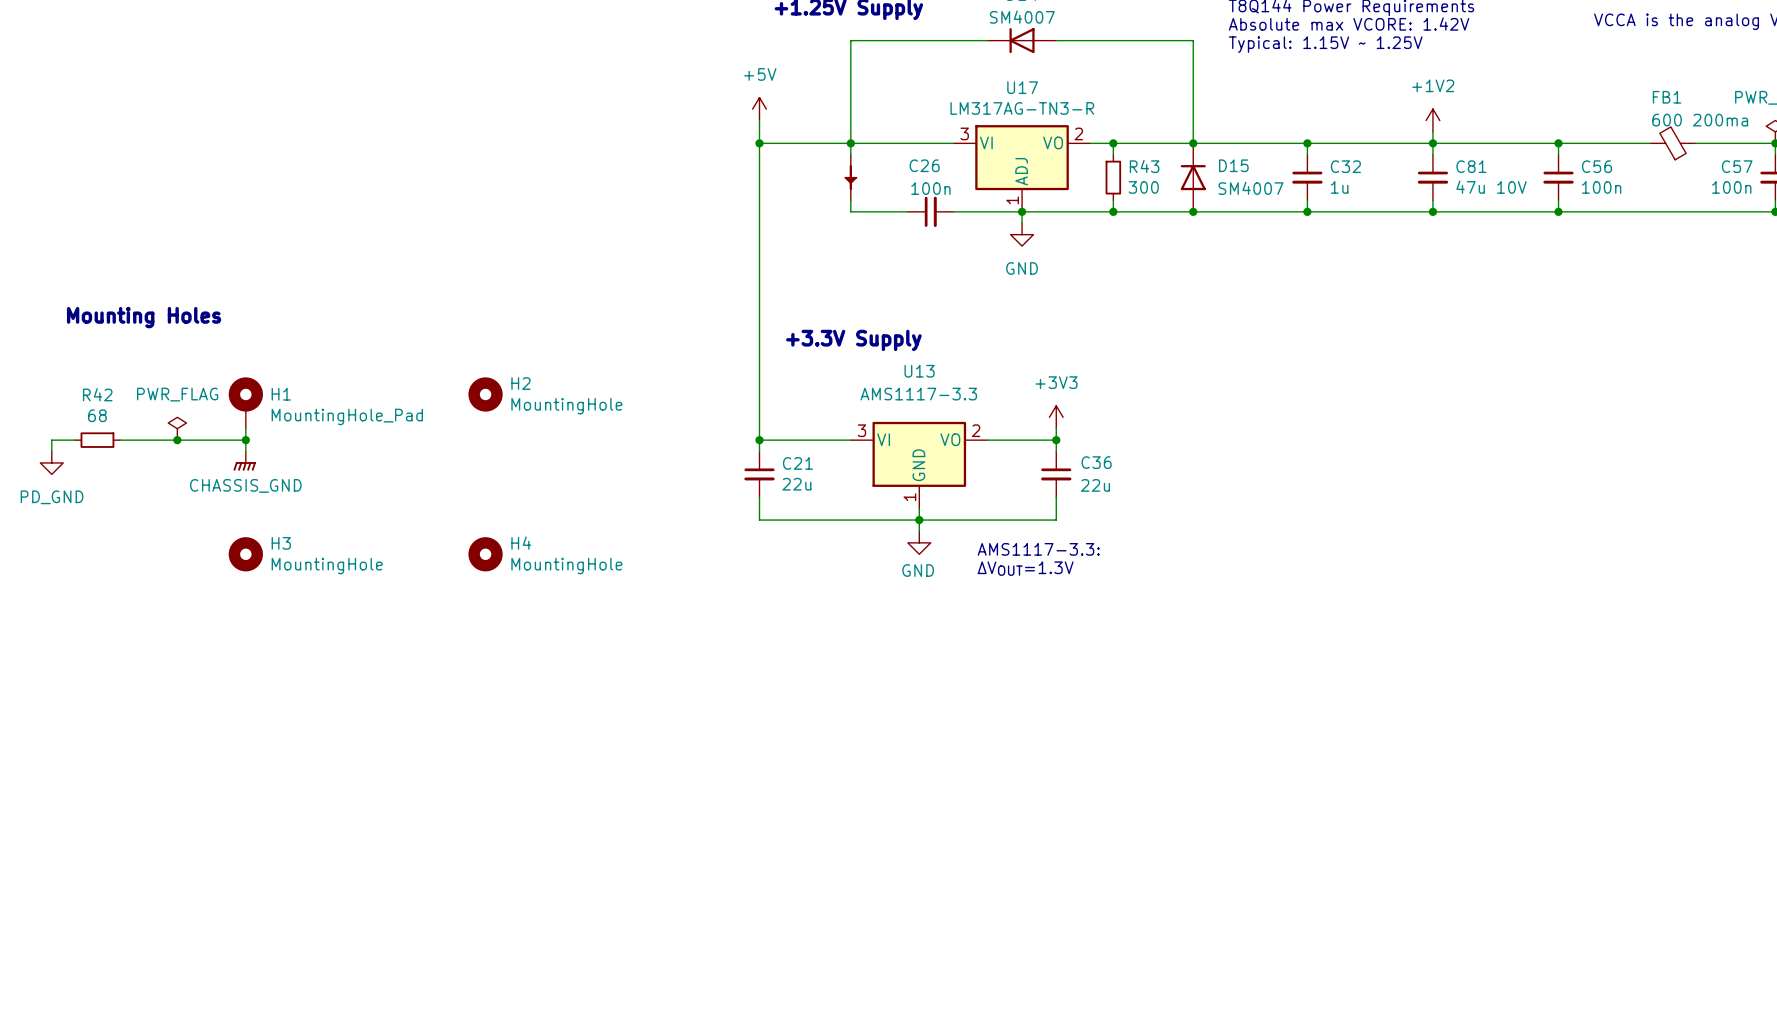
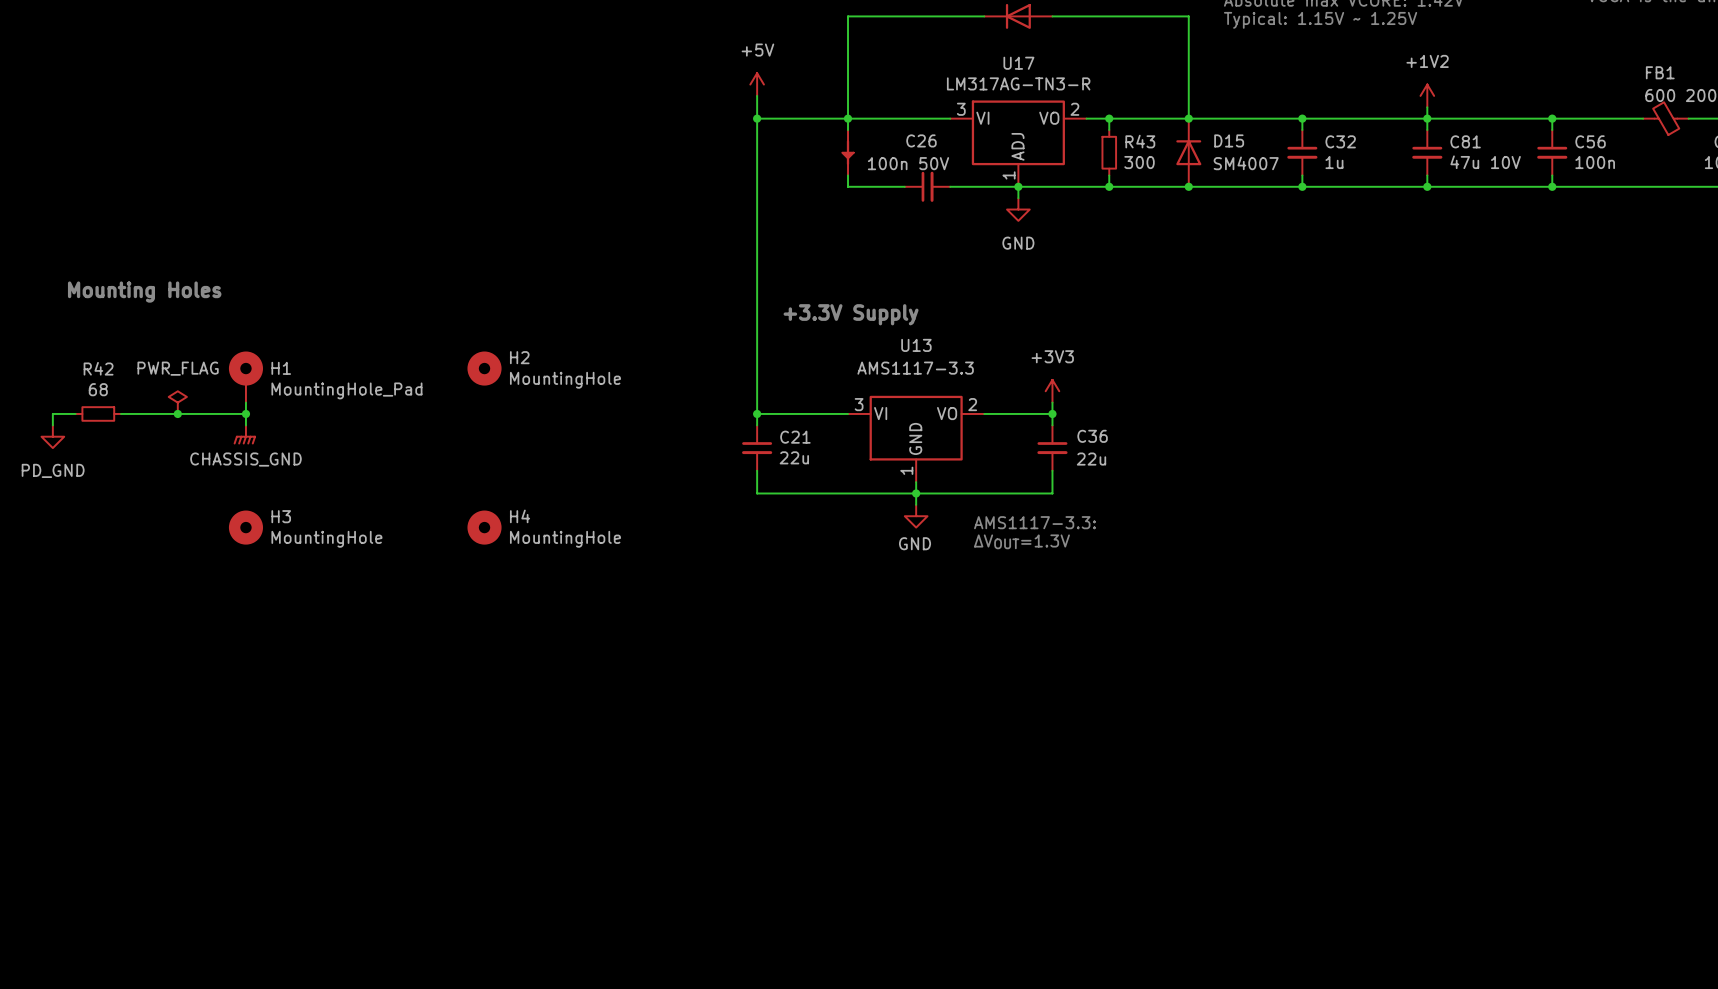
C26 value: 100n (930, 188) -> 100n 50V (908, 163)

